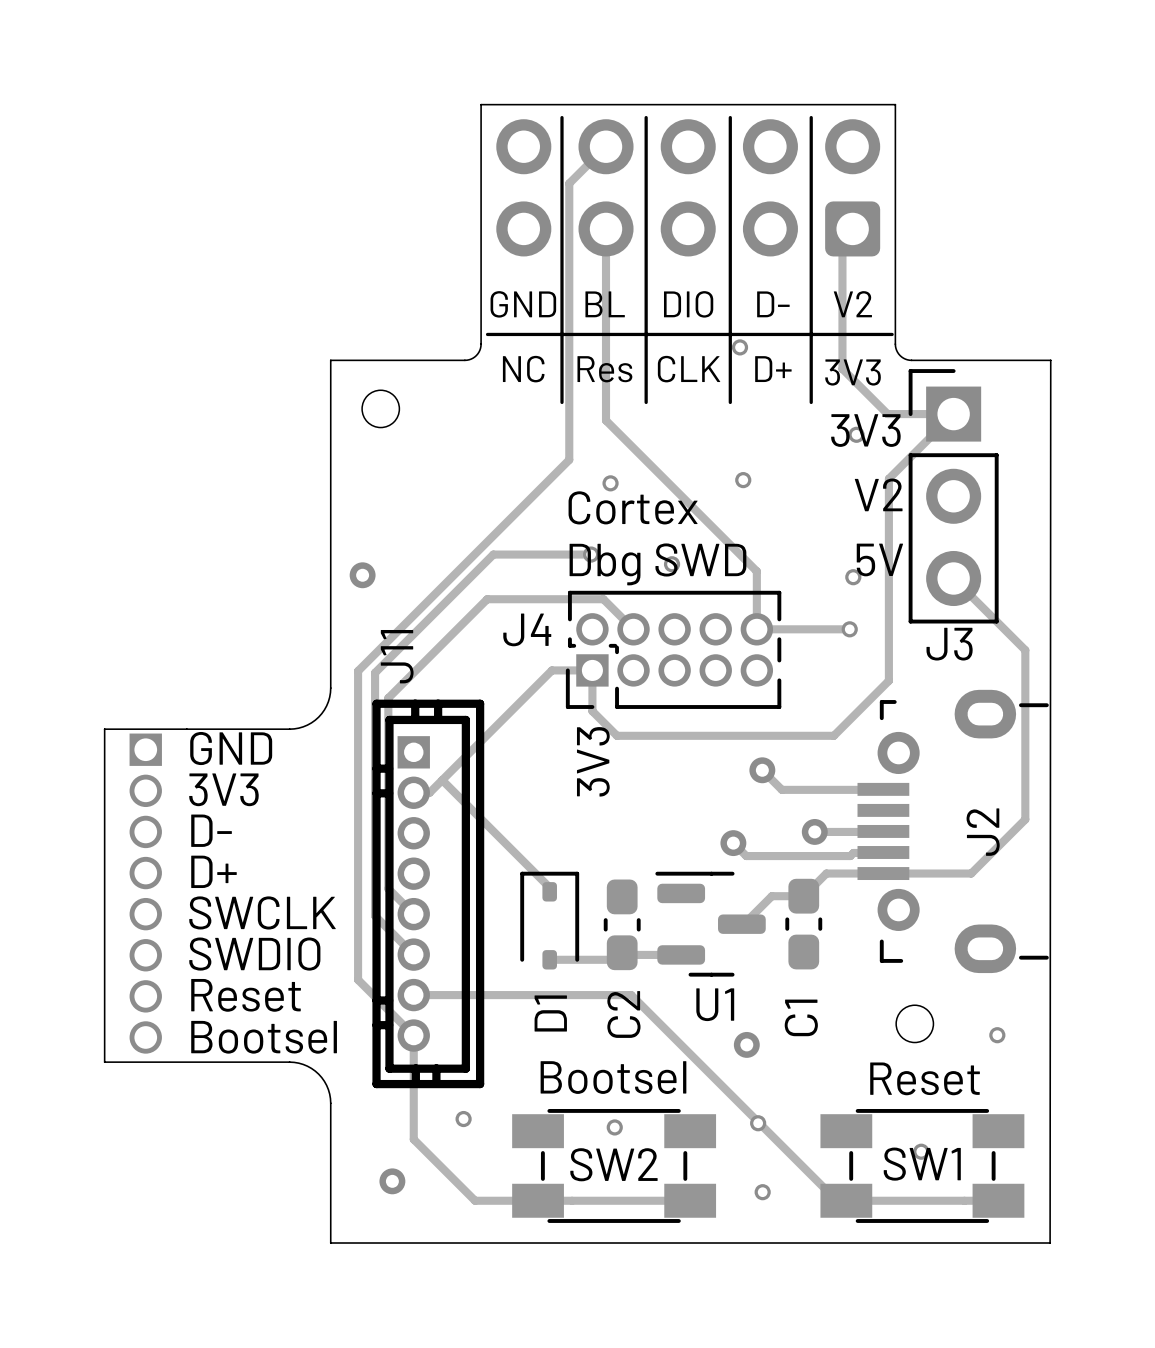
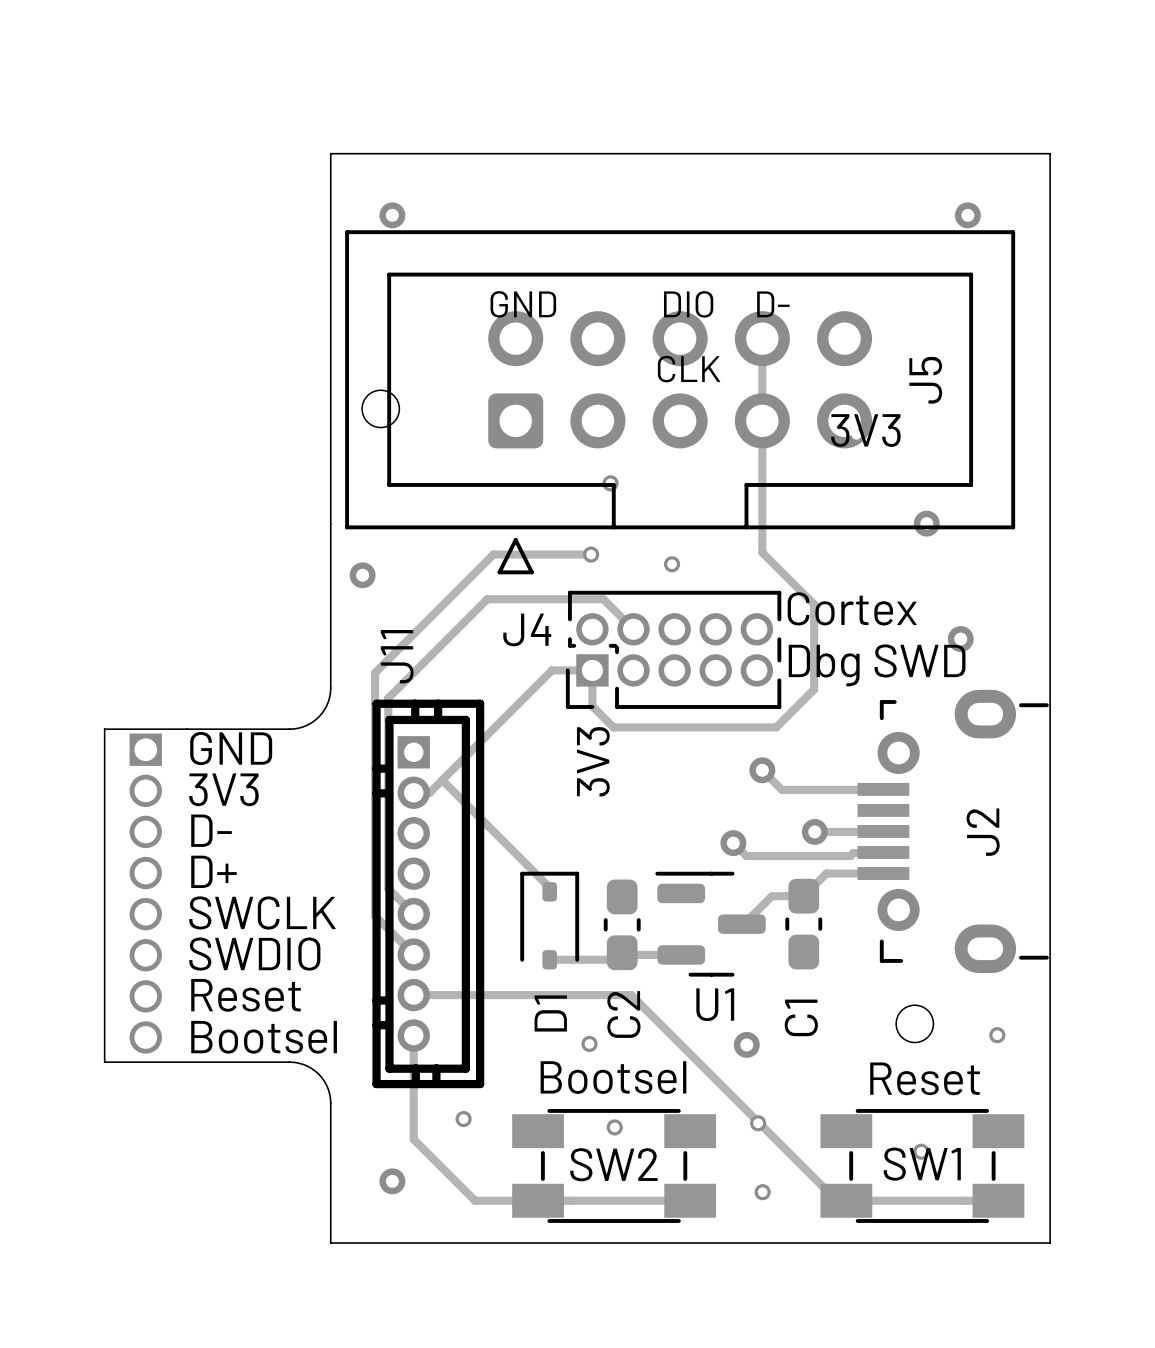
line: (562, 117) (562, 402) -> none
line: (646, 117) (646, 402) -> none
line: (730, 117) (730, 402) -> none
line: (811, 117) (811, 402) -> none
track: (606, 146) (569, 183) (569, 459) (358, 671) (358, 979) (413, 1035) -> none
J5 side: bottom (688, 187) -> top (680, 402)
via: none -> (392, 215)
via: none -> (967, 215)
track: (606, 228) (606, 420) (756, 571) (756, 629) (849, 629) -> none
track: (852, 228) (842, 239) (842, 368) (887, 414) (953, 414) (888, 478) (888, 680) (833, 735) (617, 735) (592, 711) (592, 706) -> (762, 338) (762, 552) (814, 604) (814, 689) (776, 727) (613, 727) (592, 706)
text: BL (605, 304) -> none
text: V2 (852, 304) -> none
line: (487, 334) (892, 334) -> none
via: (740, 347) -> none
board edge: (330, 360) (464, 360) (472, 358) (478, 352) (481, 344) (481, 104) (895, 104) (895, 344) (897, 352) (903, 358) (911, 360) (1050, 360) (1050, 1243) -> (330, 360) (330, 153) (1050, 153) (1050, 1243)
text: NC (523, 369) -> none
text: Res (604, 369) -> none
text: D+ (773, 369) -> none
text: 3V3 (853, 372) -> none
via: (743, 480) -> none
text: V2 (878, 494) -> none
J3: (953, 496) -> none
text position: Cortex (633, 507) -> Cortex (852, 608)
via: none -> (926, 523)
text: 5V (879, 559) -> none
text position: Dbg SWD (657, 564) -> Dbg SWD (877, 665)
via: (853, 577) -> none
track: (953, 578) (1025, 650) (1025, 819) (971, 873) (883, 873) -> none
via: (849, 629) -> none
via: none -> (960, 639)
via: none -> (589, 1043)

